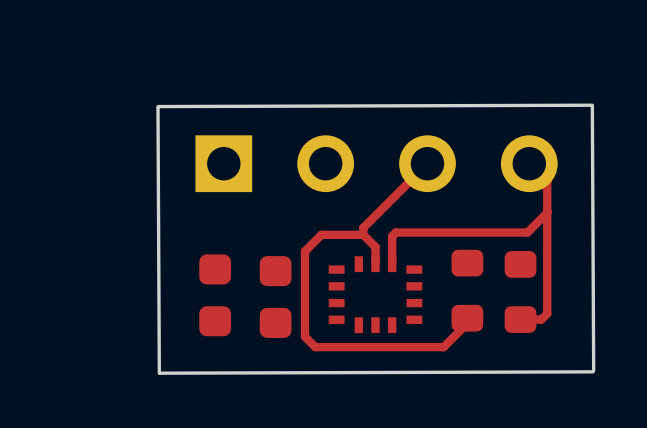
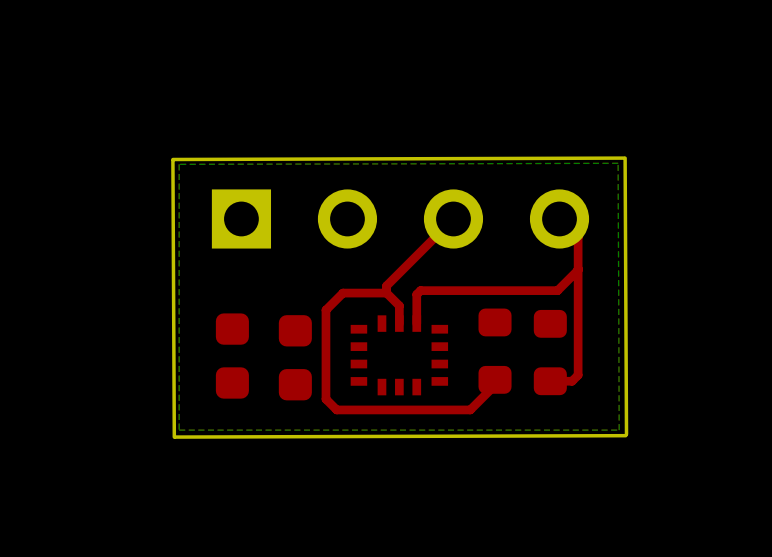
bottom zone outline: none -> (618, 163) (619, 430) (179, 430) (179, 164) (618, 163)

